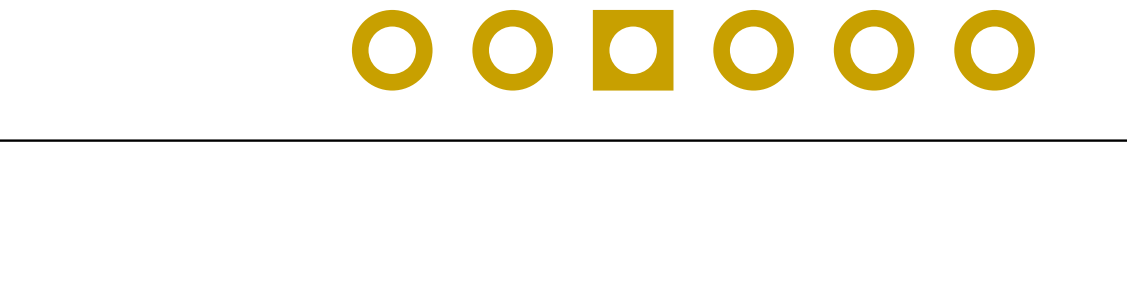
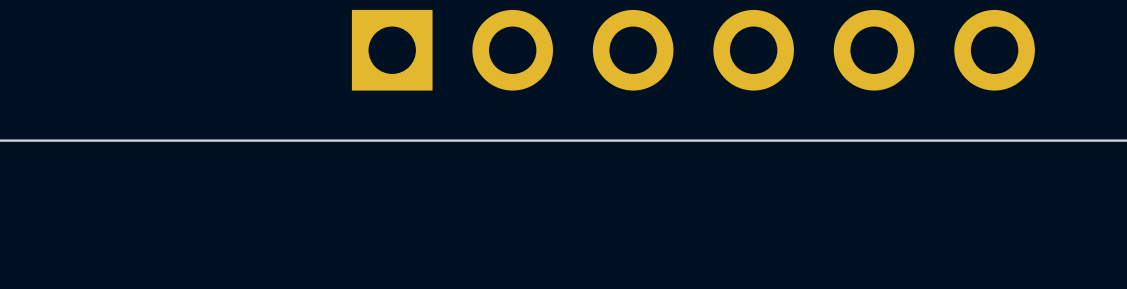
part footprint: [351, 9, 1035, 91] -> [351, 9, 1035, 91]

